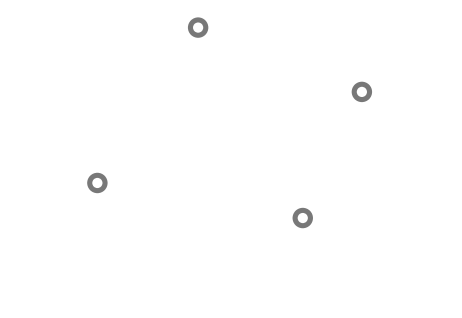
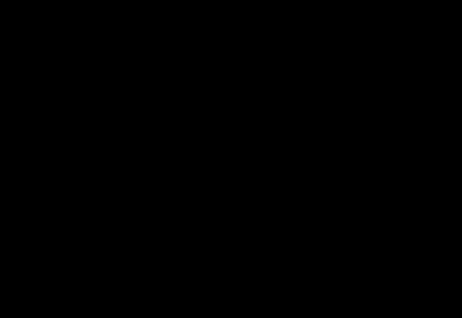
via: (198, 27) -> none
via: (361, 91) -> none
via: (97, 182) -> none
via: (302, 218) -> none

